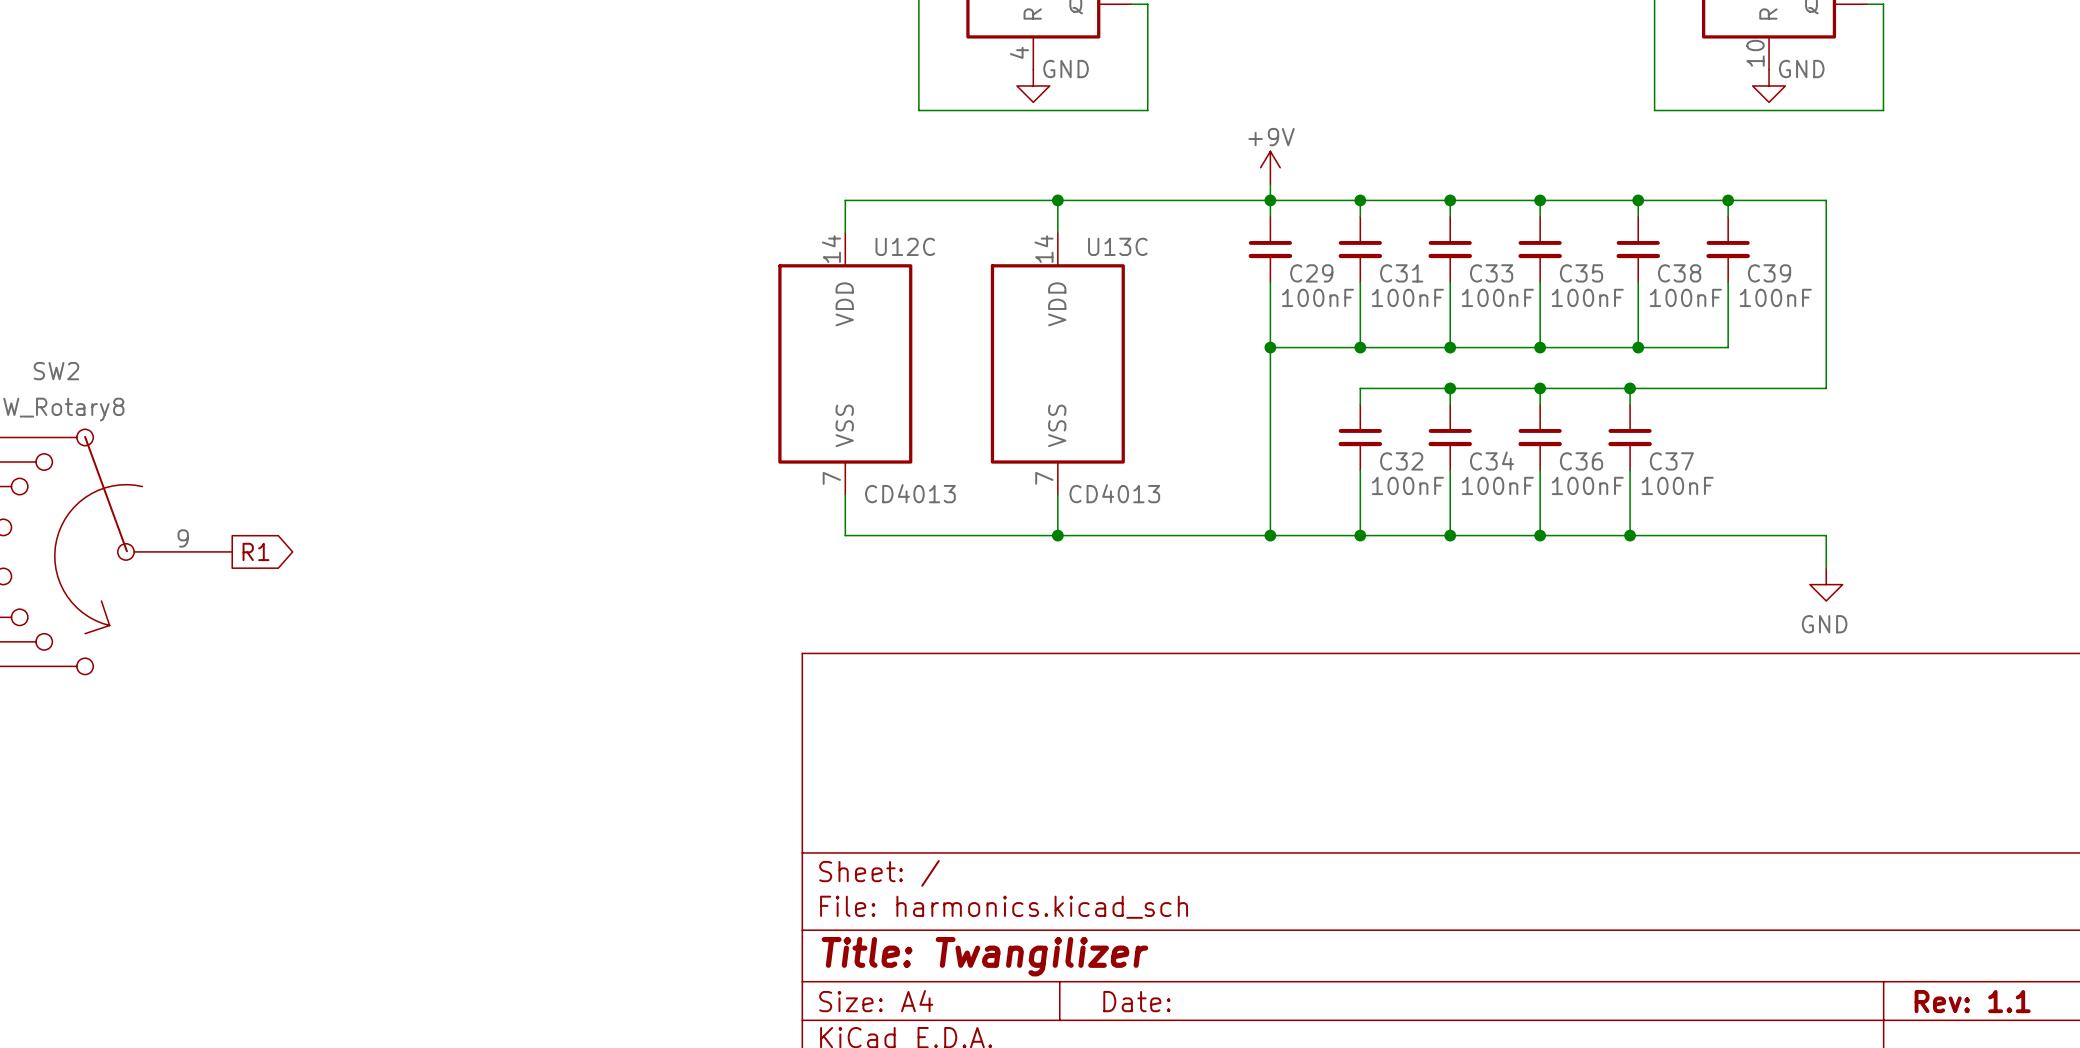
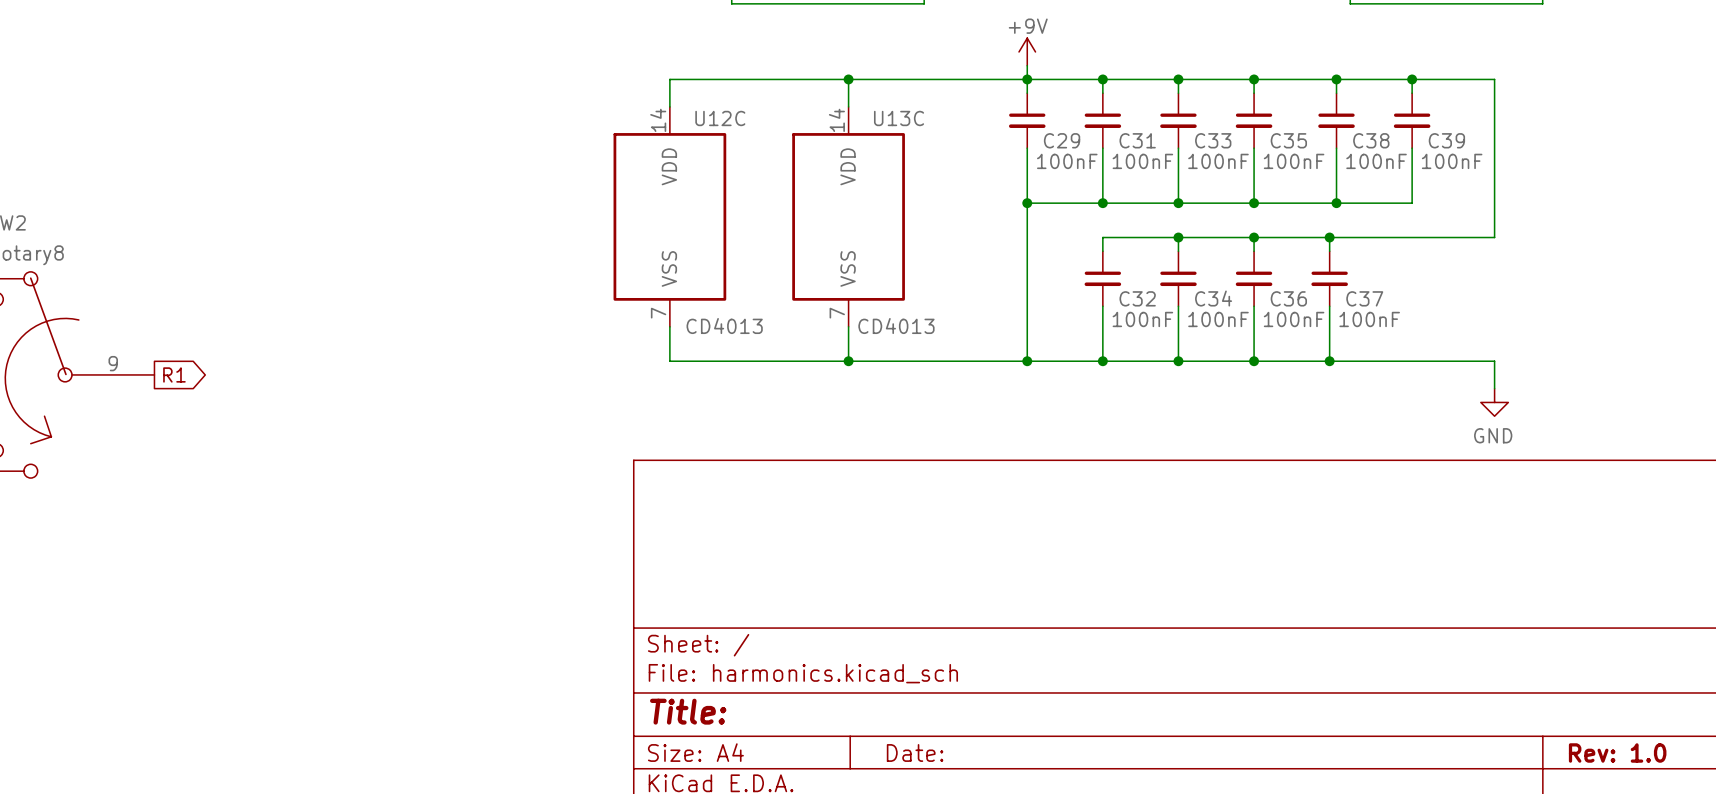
title block: Title: Twangilizer (984, 956) -> Title: (688, 711)
title block: Rev: 1.1 (1972, 1001) -> Rev: 1.0 (1617, 752)

